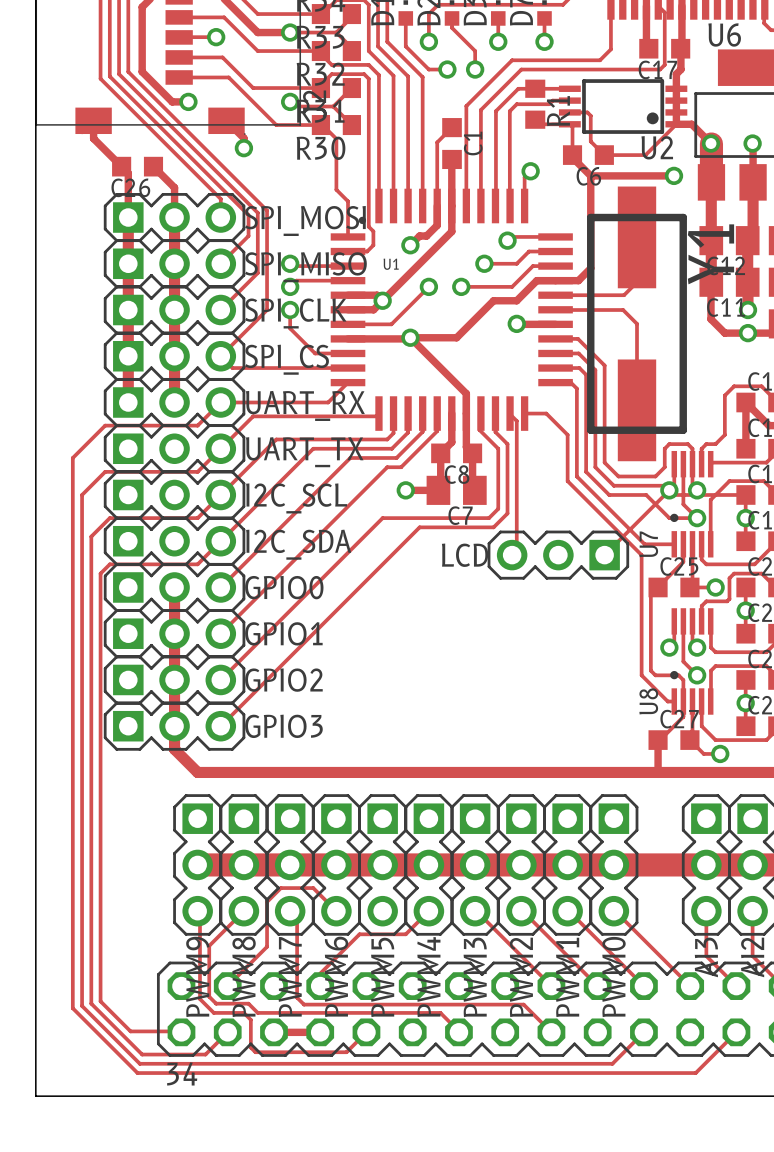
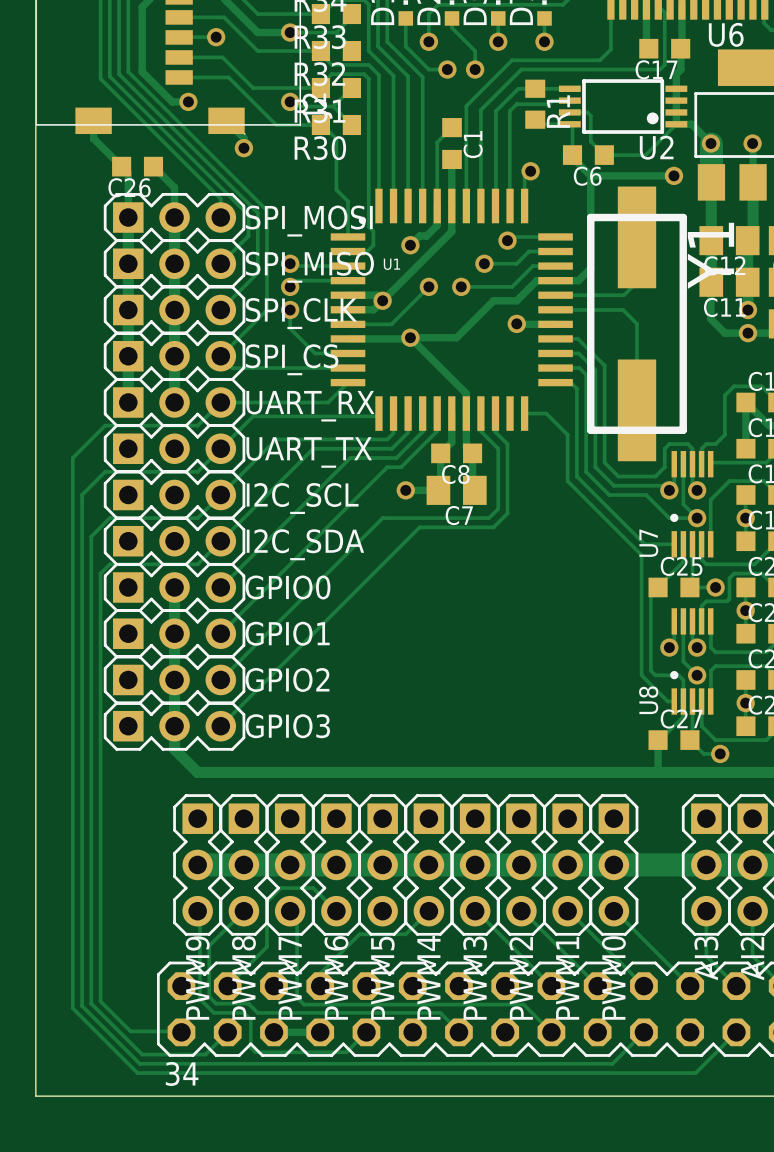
track: (510, 413) (516, 420) (516, 550) (512, 555) -> none
track: (745, 494) (664, 494) (604, 555) -> none
part: LCD (558, 555) -> none

